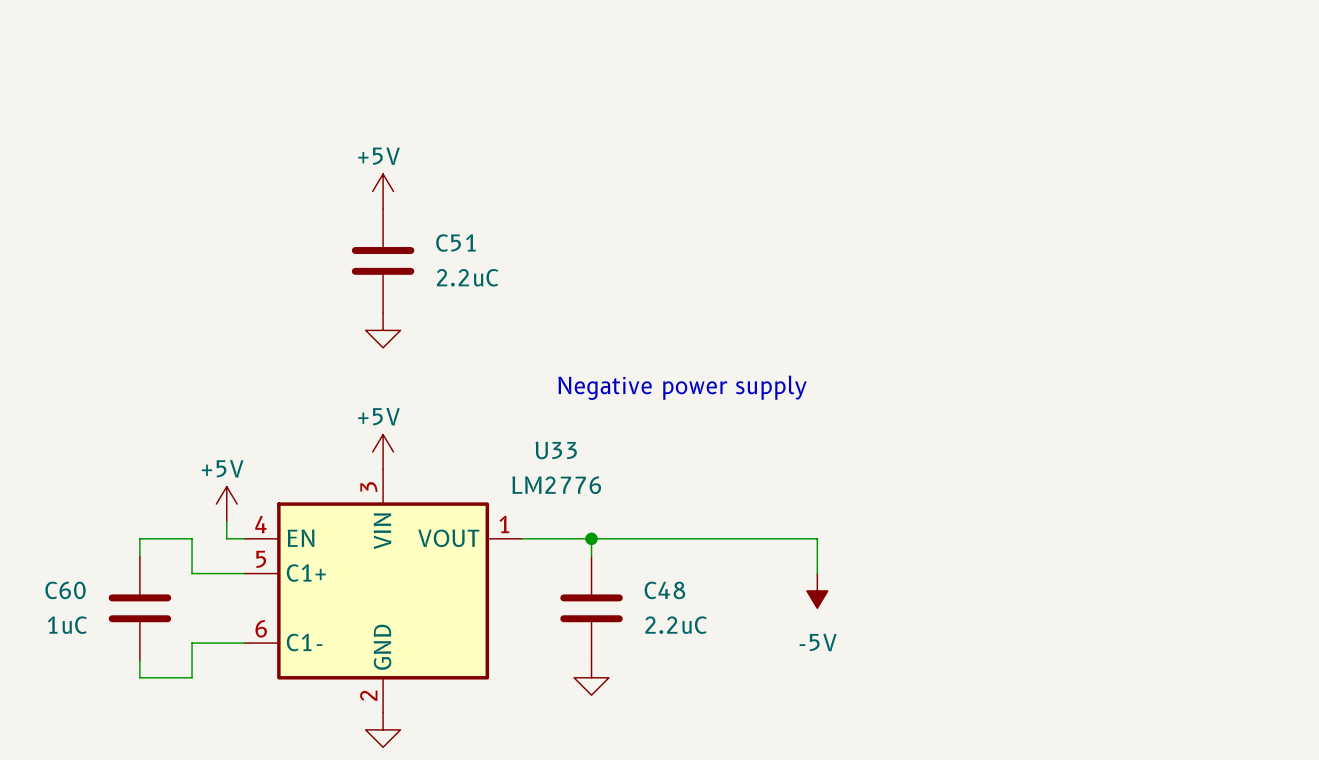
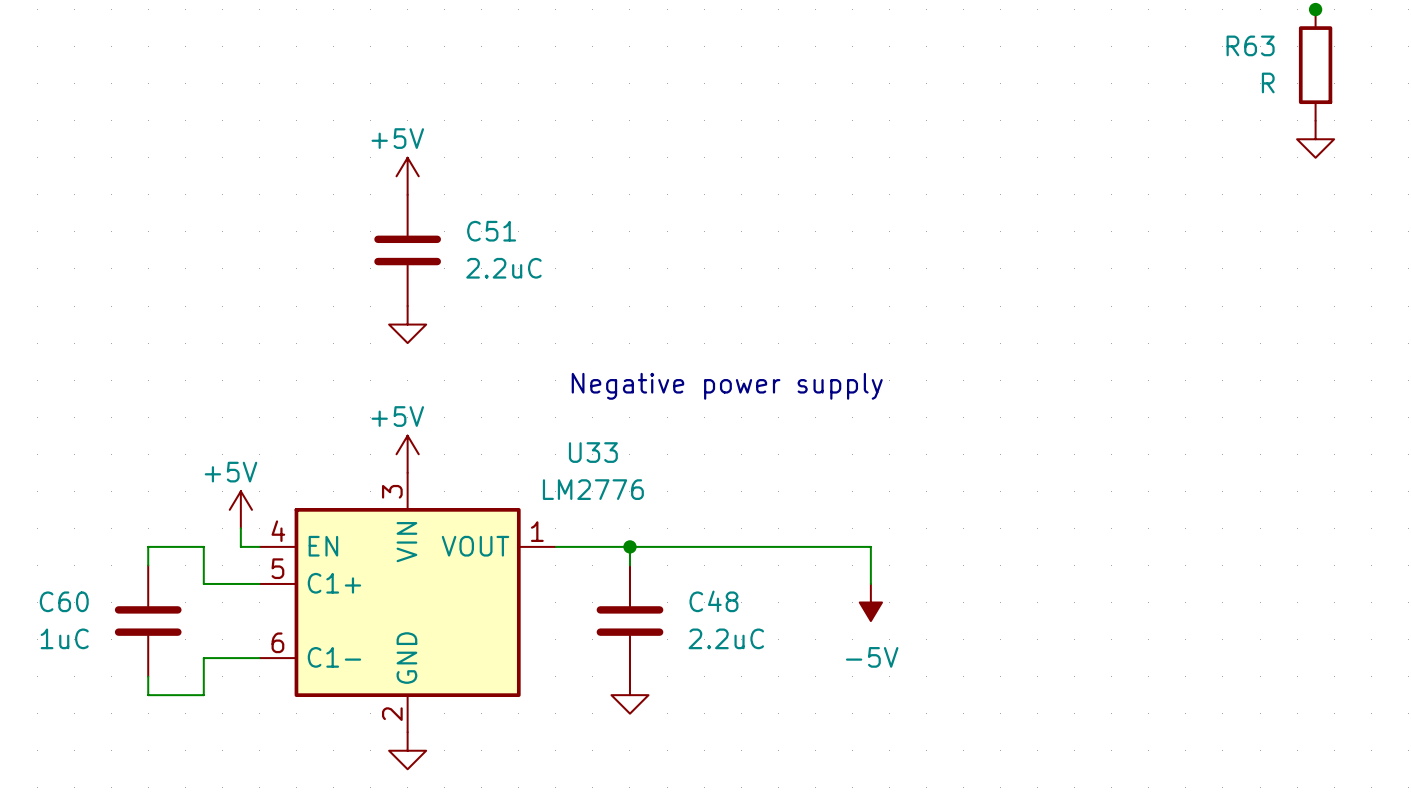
junction: none -> (1315, 9)
R63: none -> R (1315, 65)
power symbol: none -> (1315, 139)

